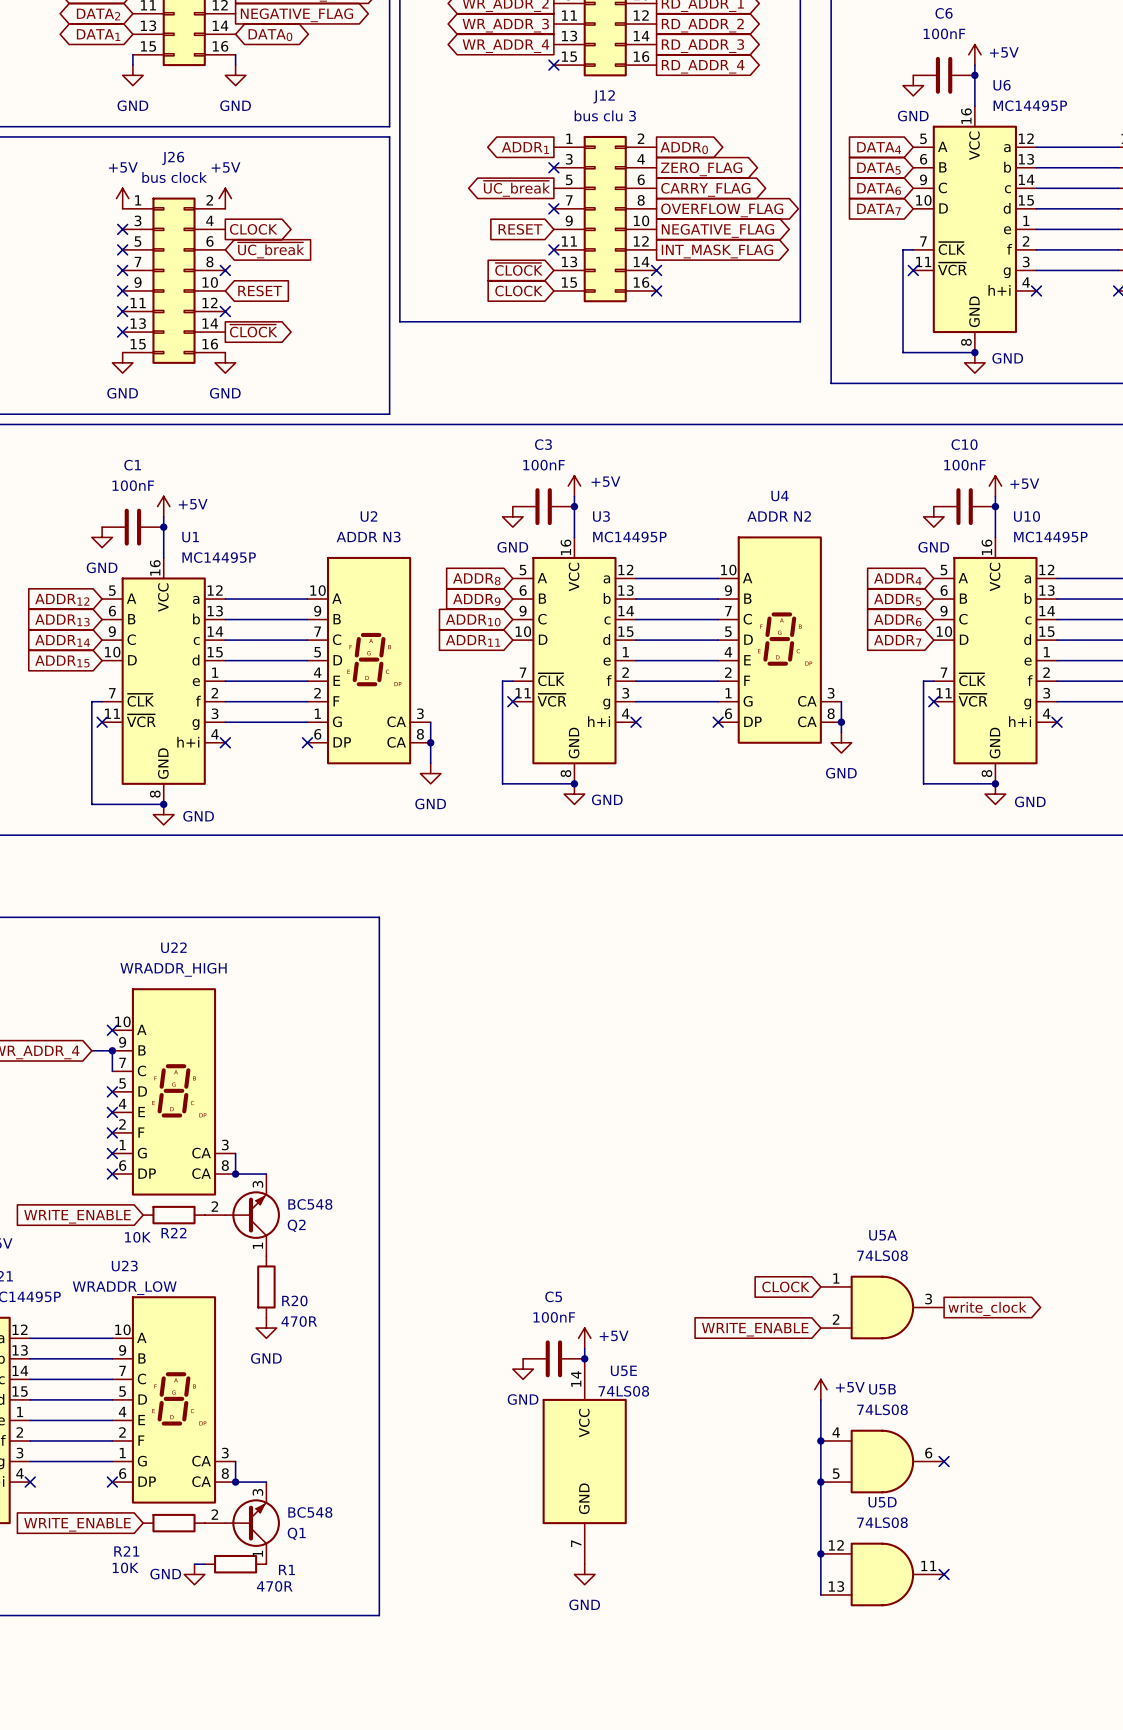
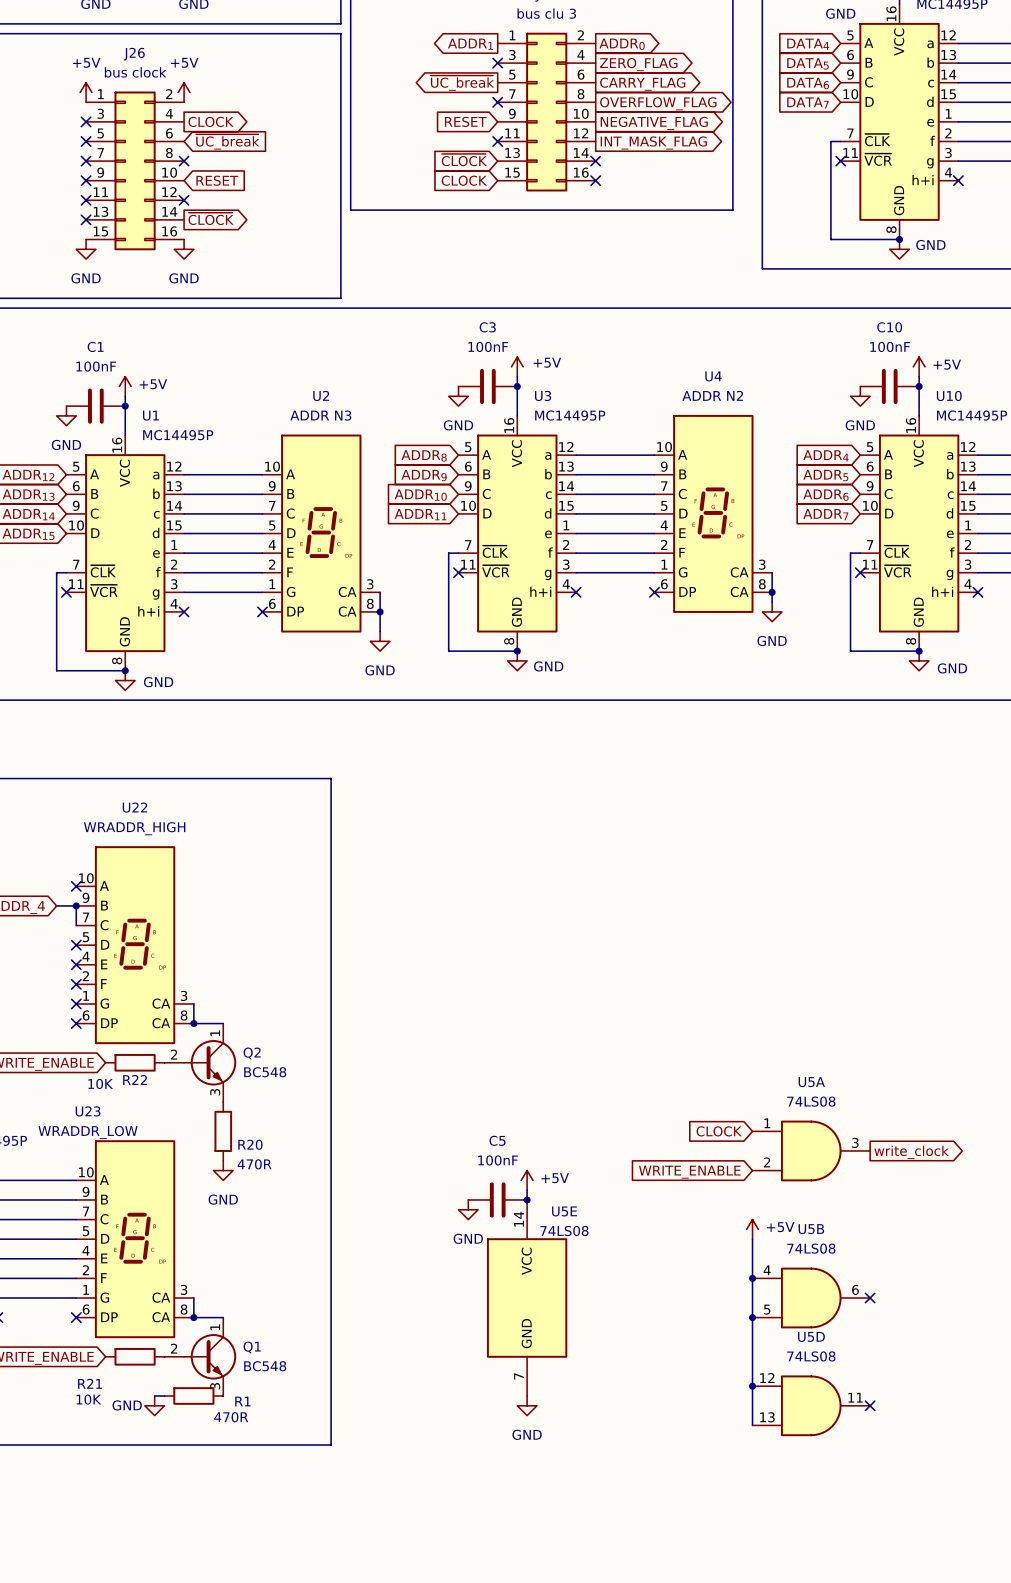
Q2 flip: as is (252, 1215) -> up-down (210, 1062)
Q1 flip: as is (252, 1523) -> up-down (210, 1356)

